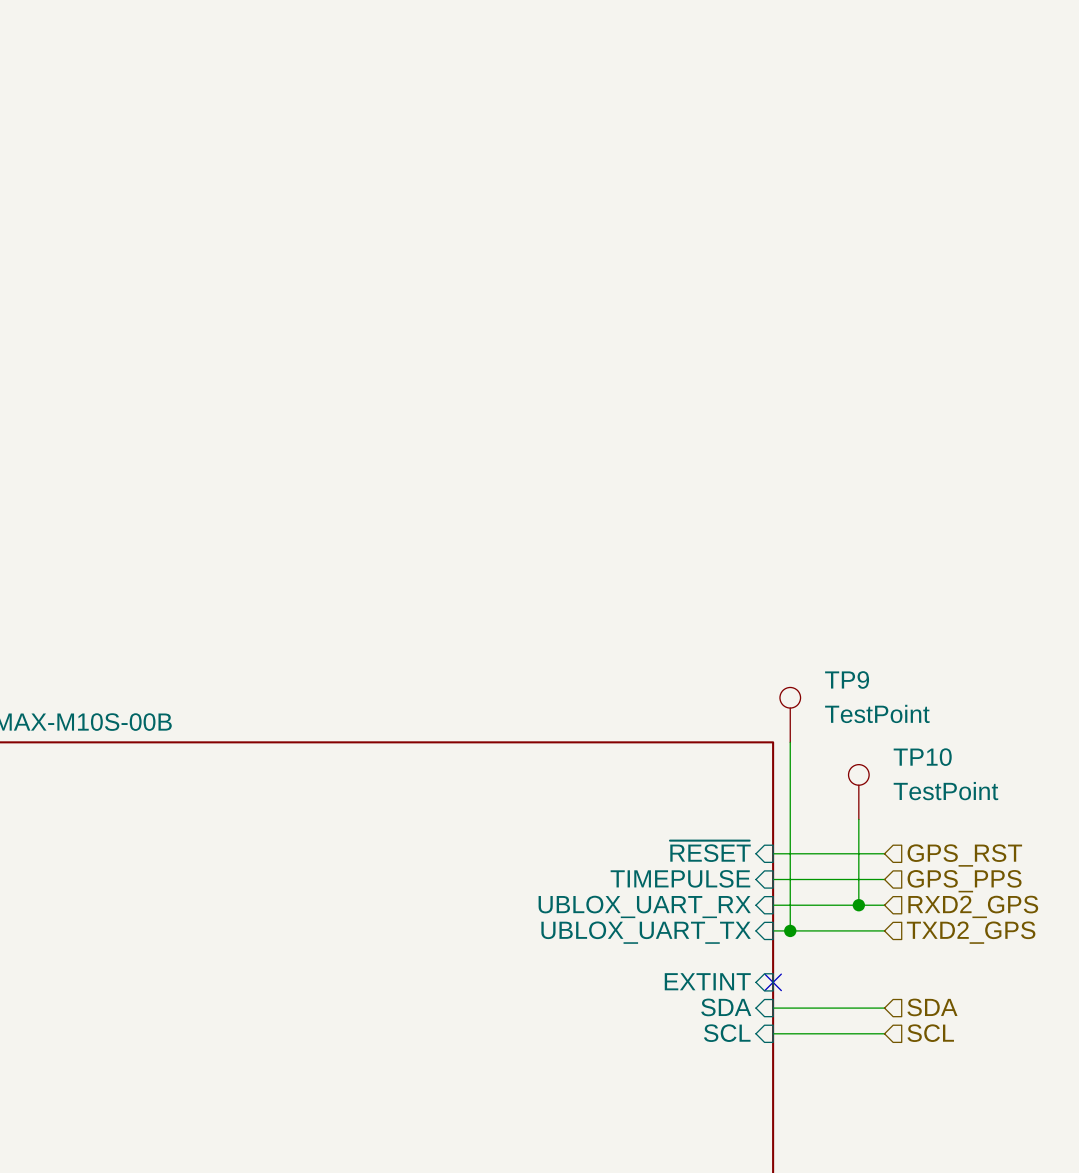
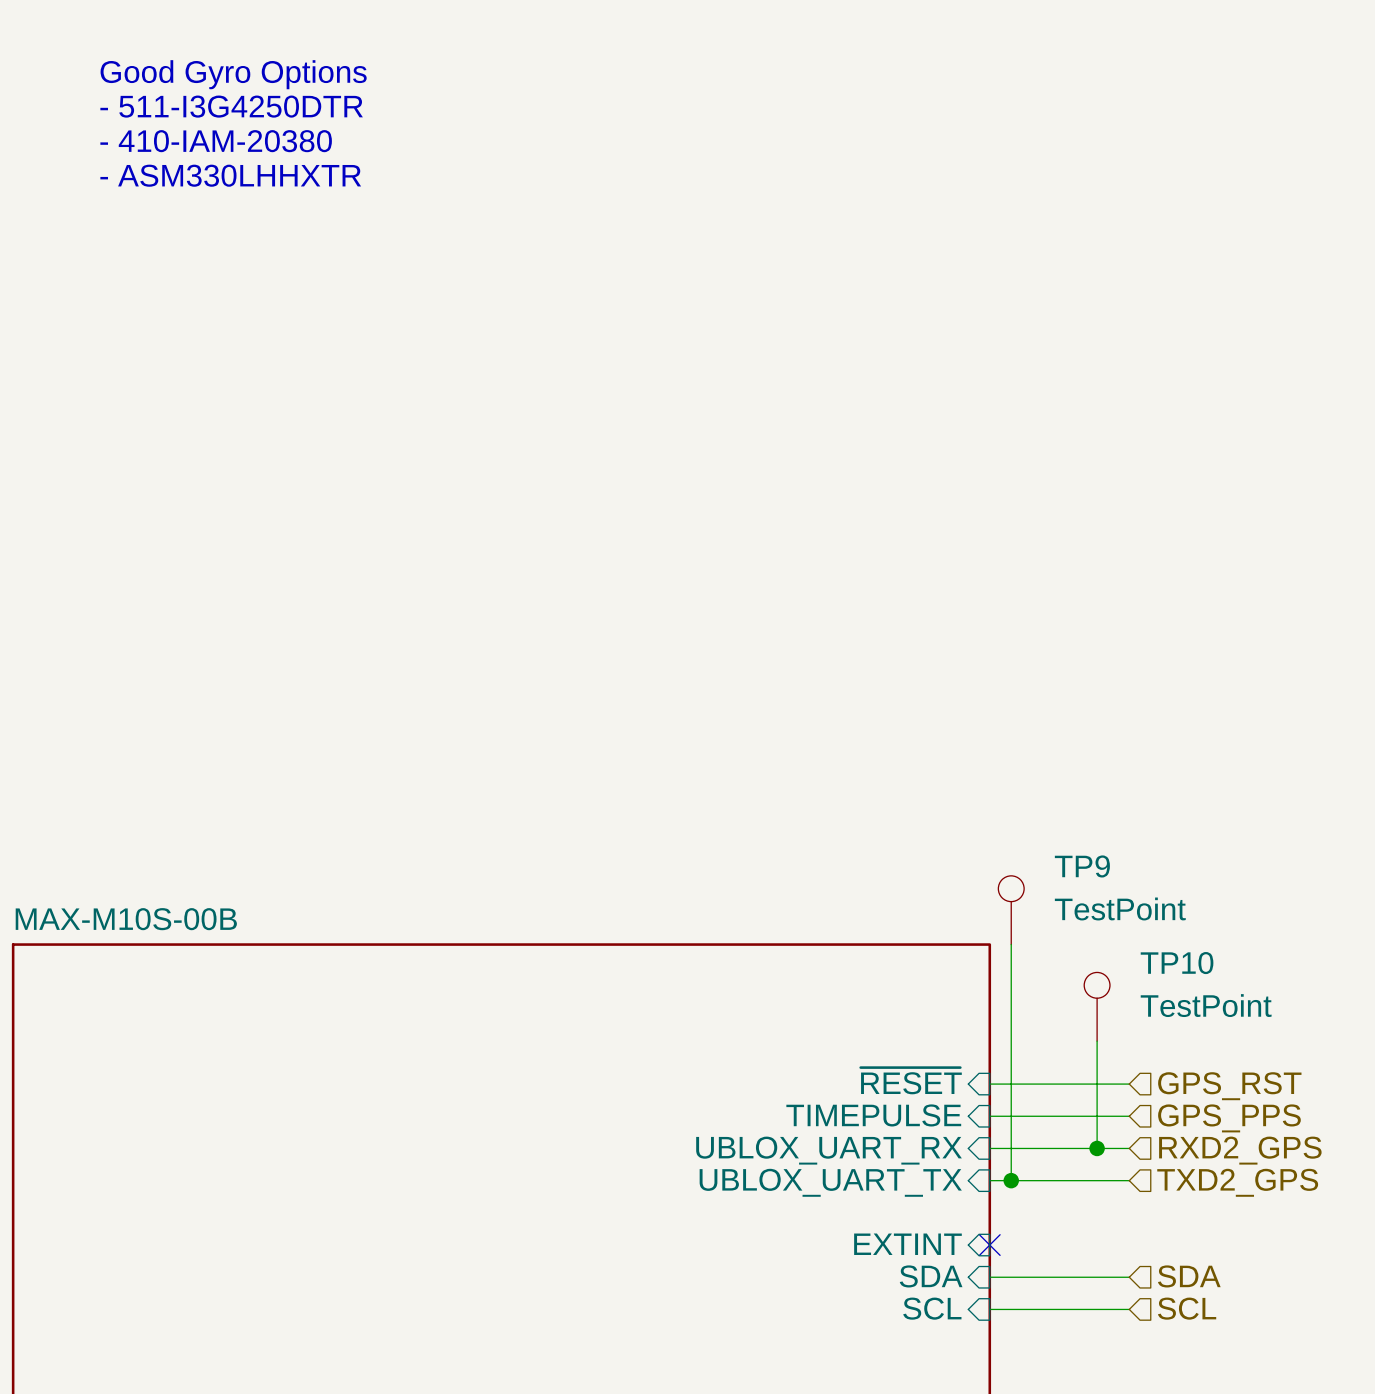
text: none -> Good Gyro Options (233, 74)
text: none -> - 511-I3G4250DTR (231, 106)
text: none -> - 410-IAM-20380 (216, 141)
text: none -> - ASM330LHHXTR (230, 175)

